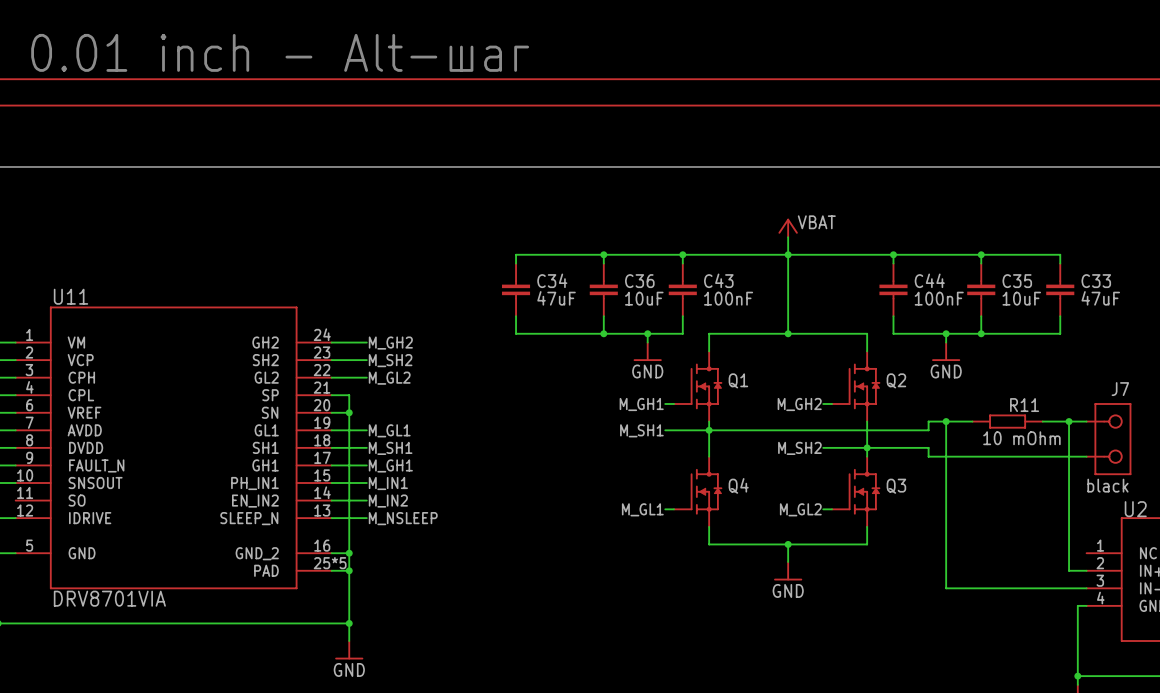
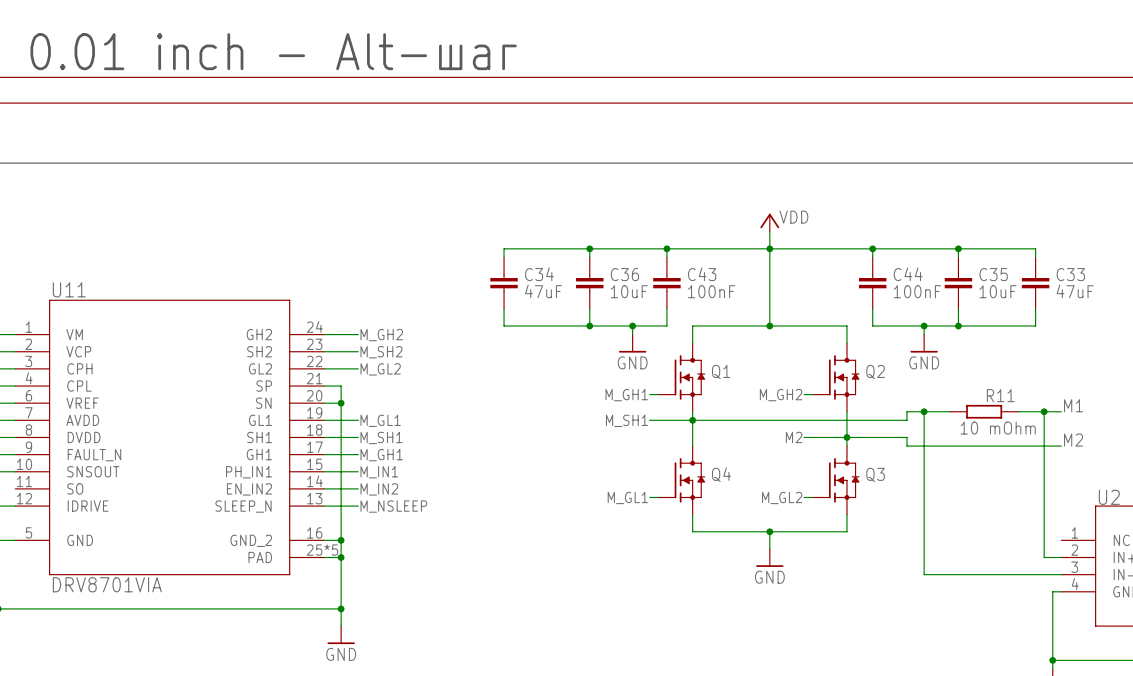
power symbol: VBAT (788, 228) -> VDD (769, 222)
label: none -> M1 (1073, 405)
J7: black (1108, 439) -> none
label: M_SH2 (799, 448) -> M2 (794, 437)
label: none -> M2 (1073, 440)

